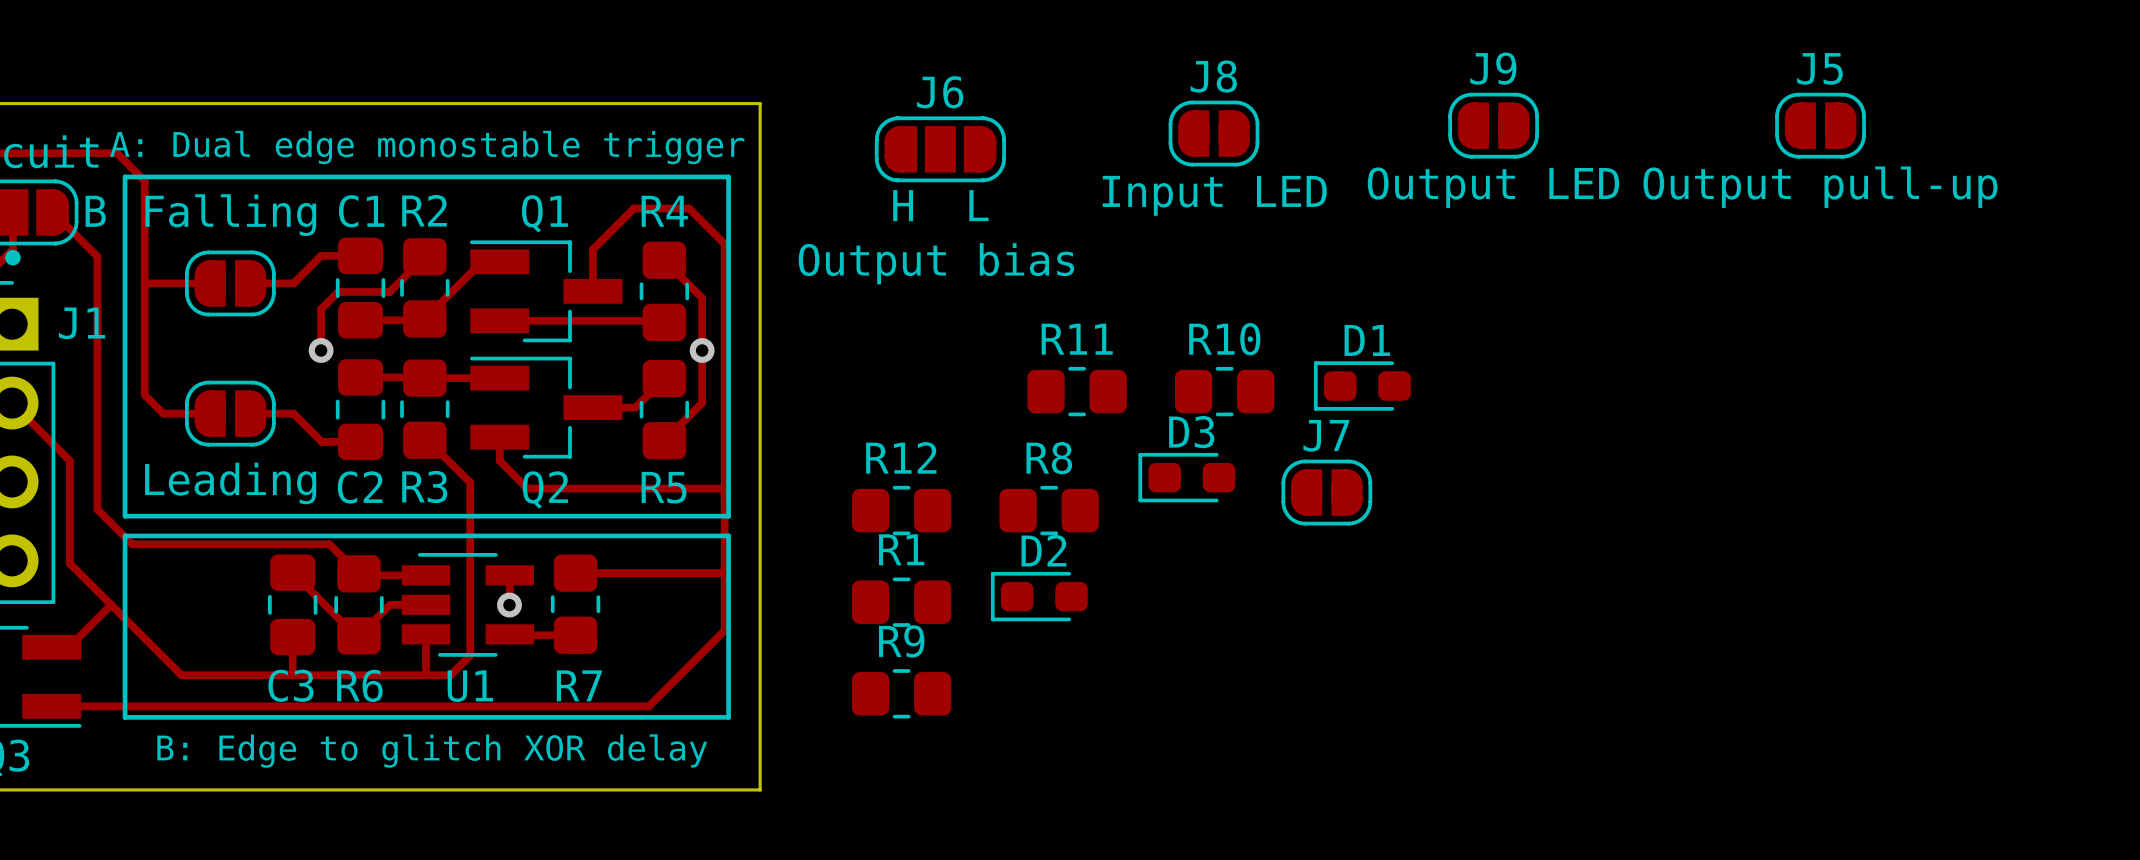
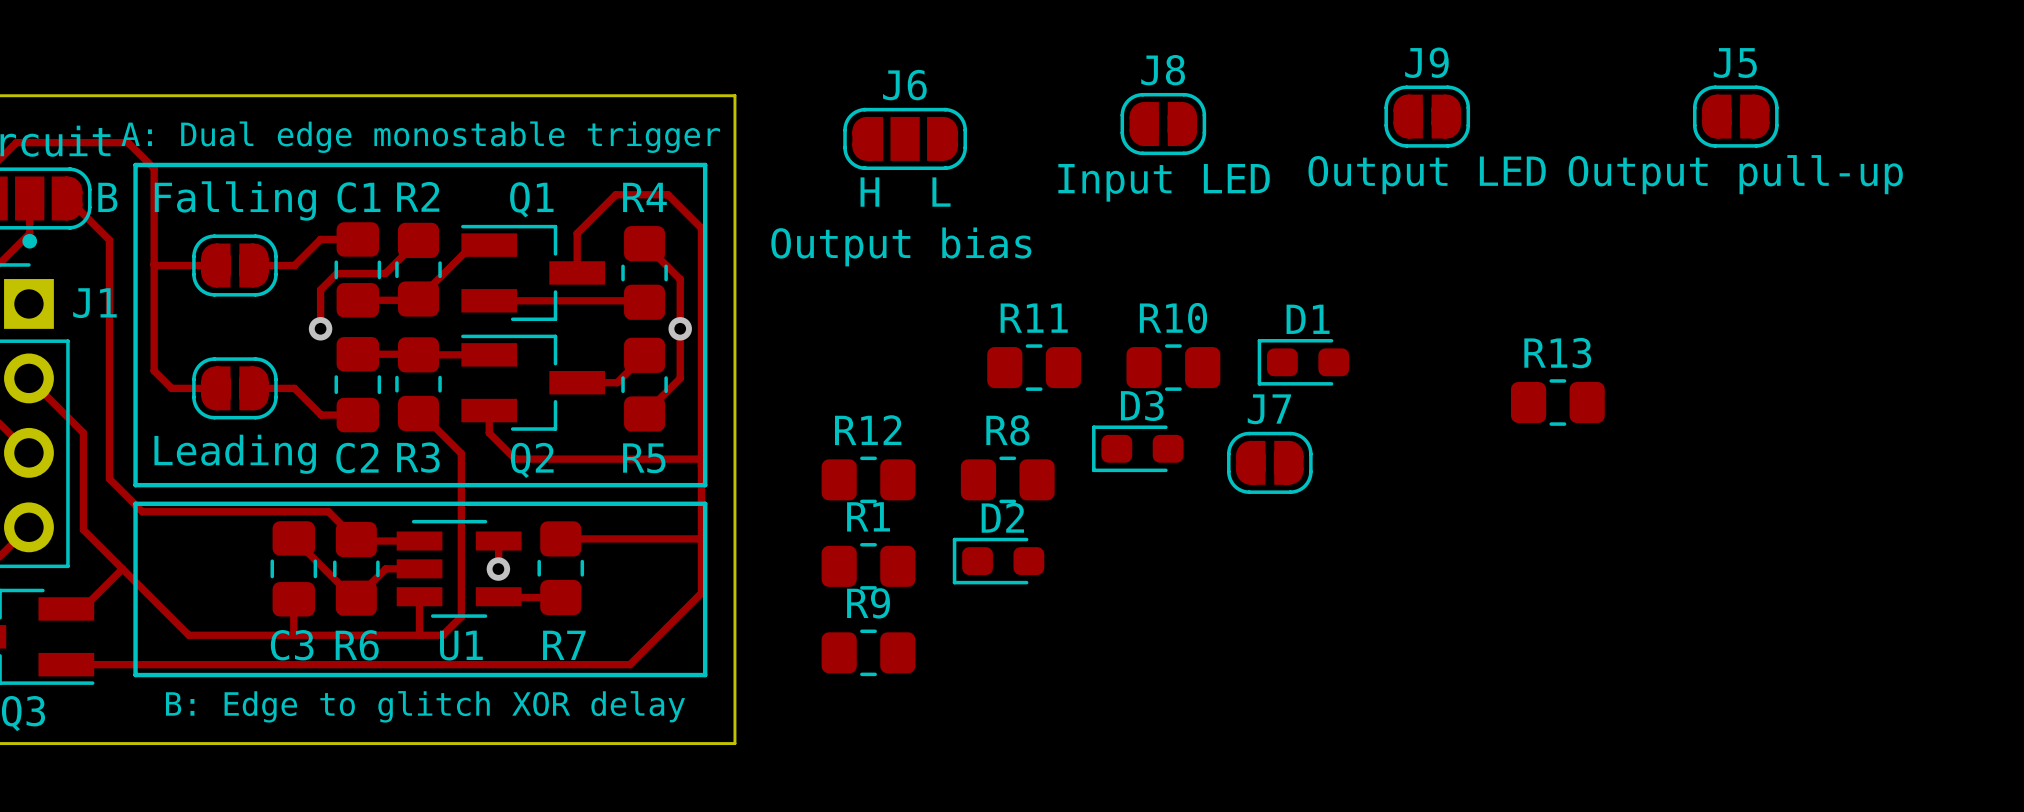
R13: none -> (1557, 402)

